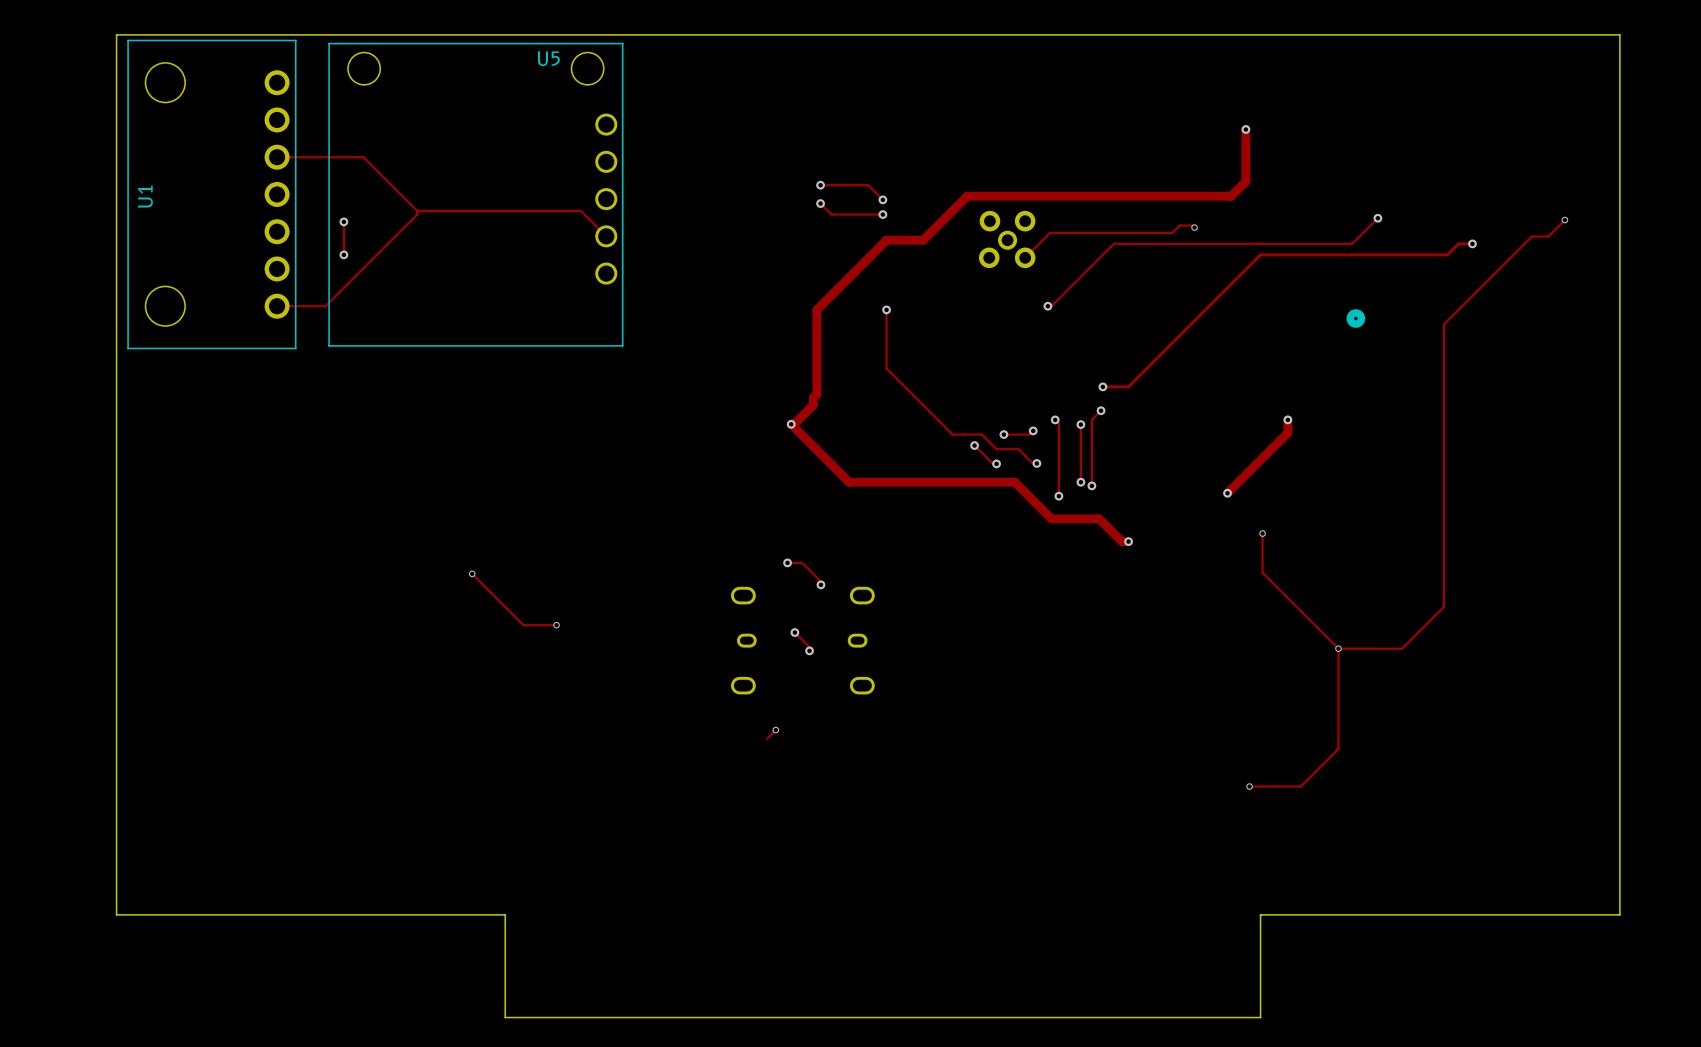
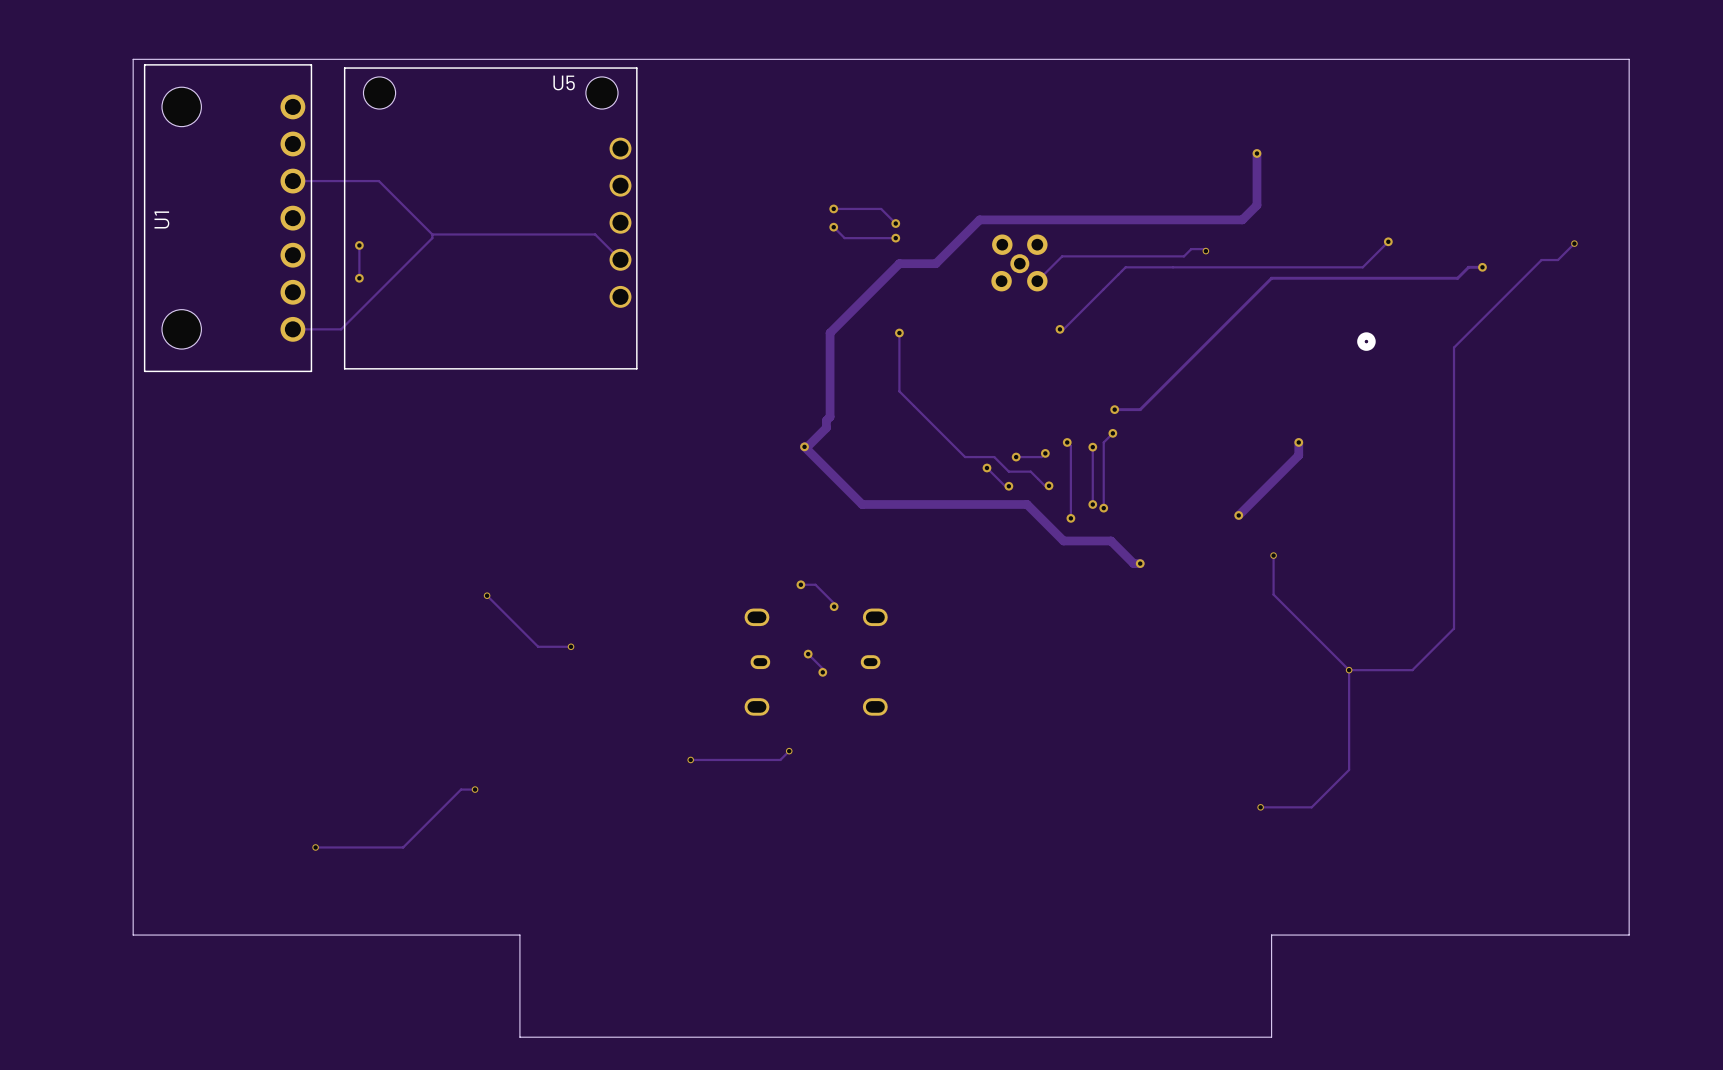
track: none -> (690, 759) (780, 759)
via: none -> (690, 759)
track: none -> (475, 789) (461, 789) (403, 847) (315, 847)
via: none -> (475, 789)
via: none -> (315, 847)

